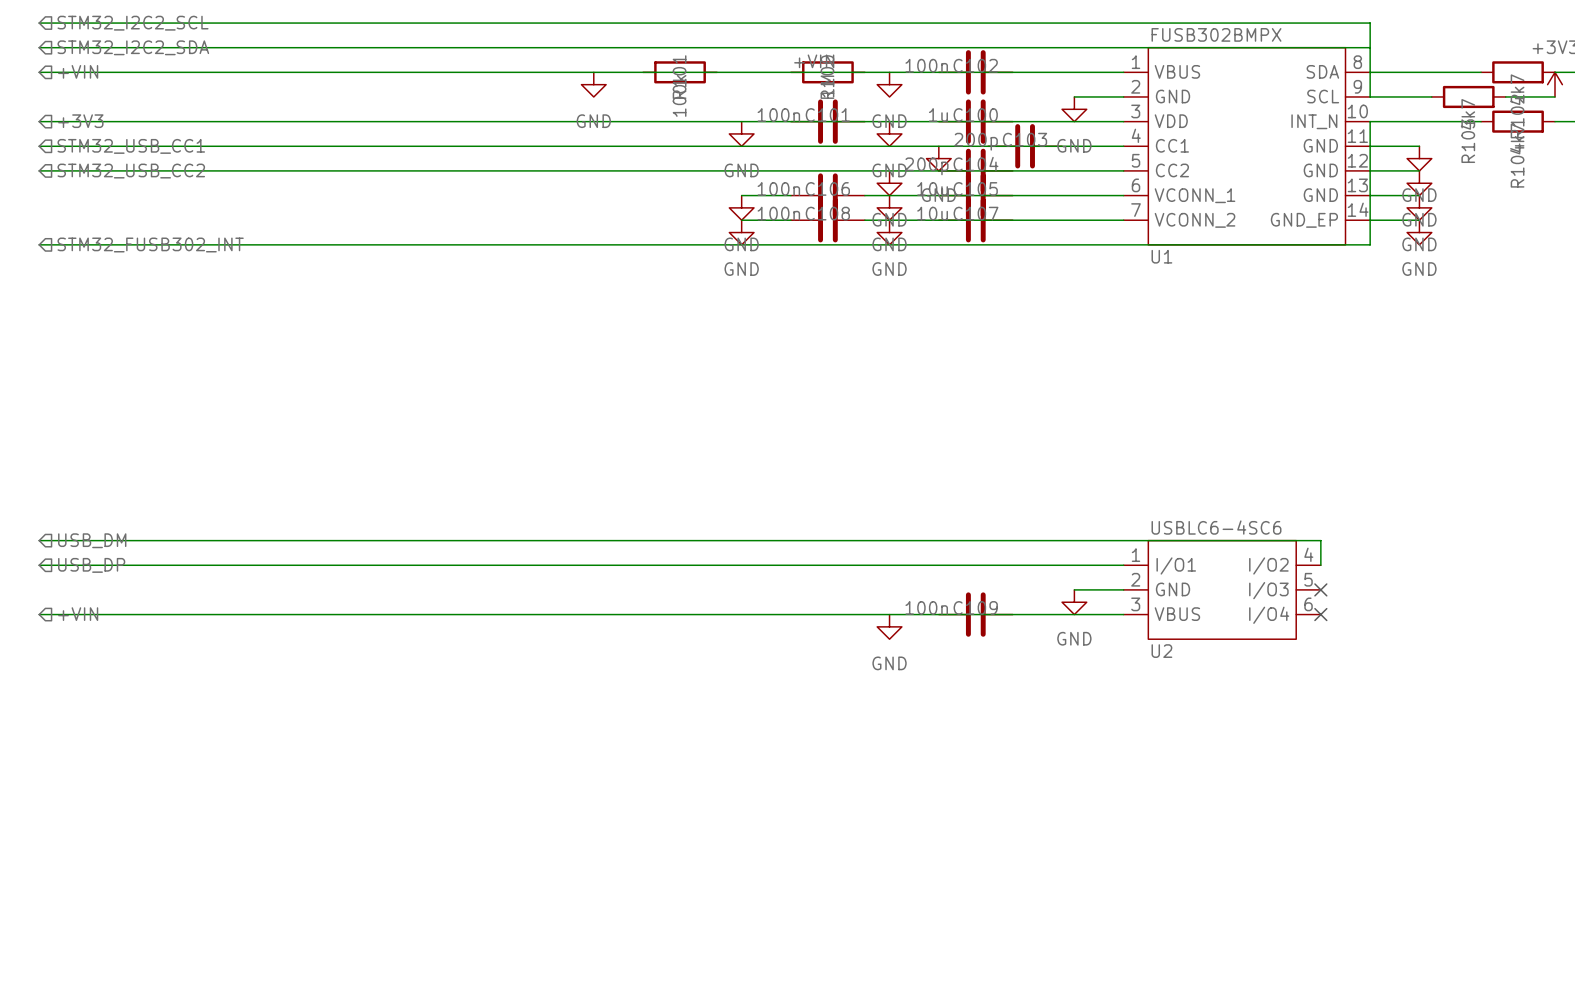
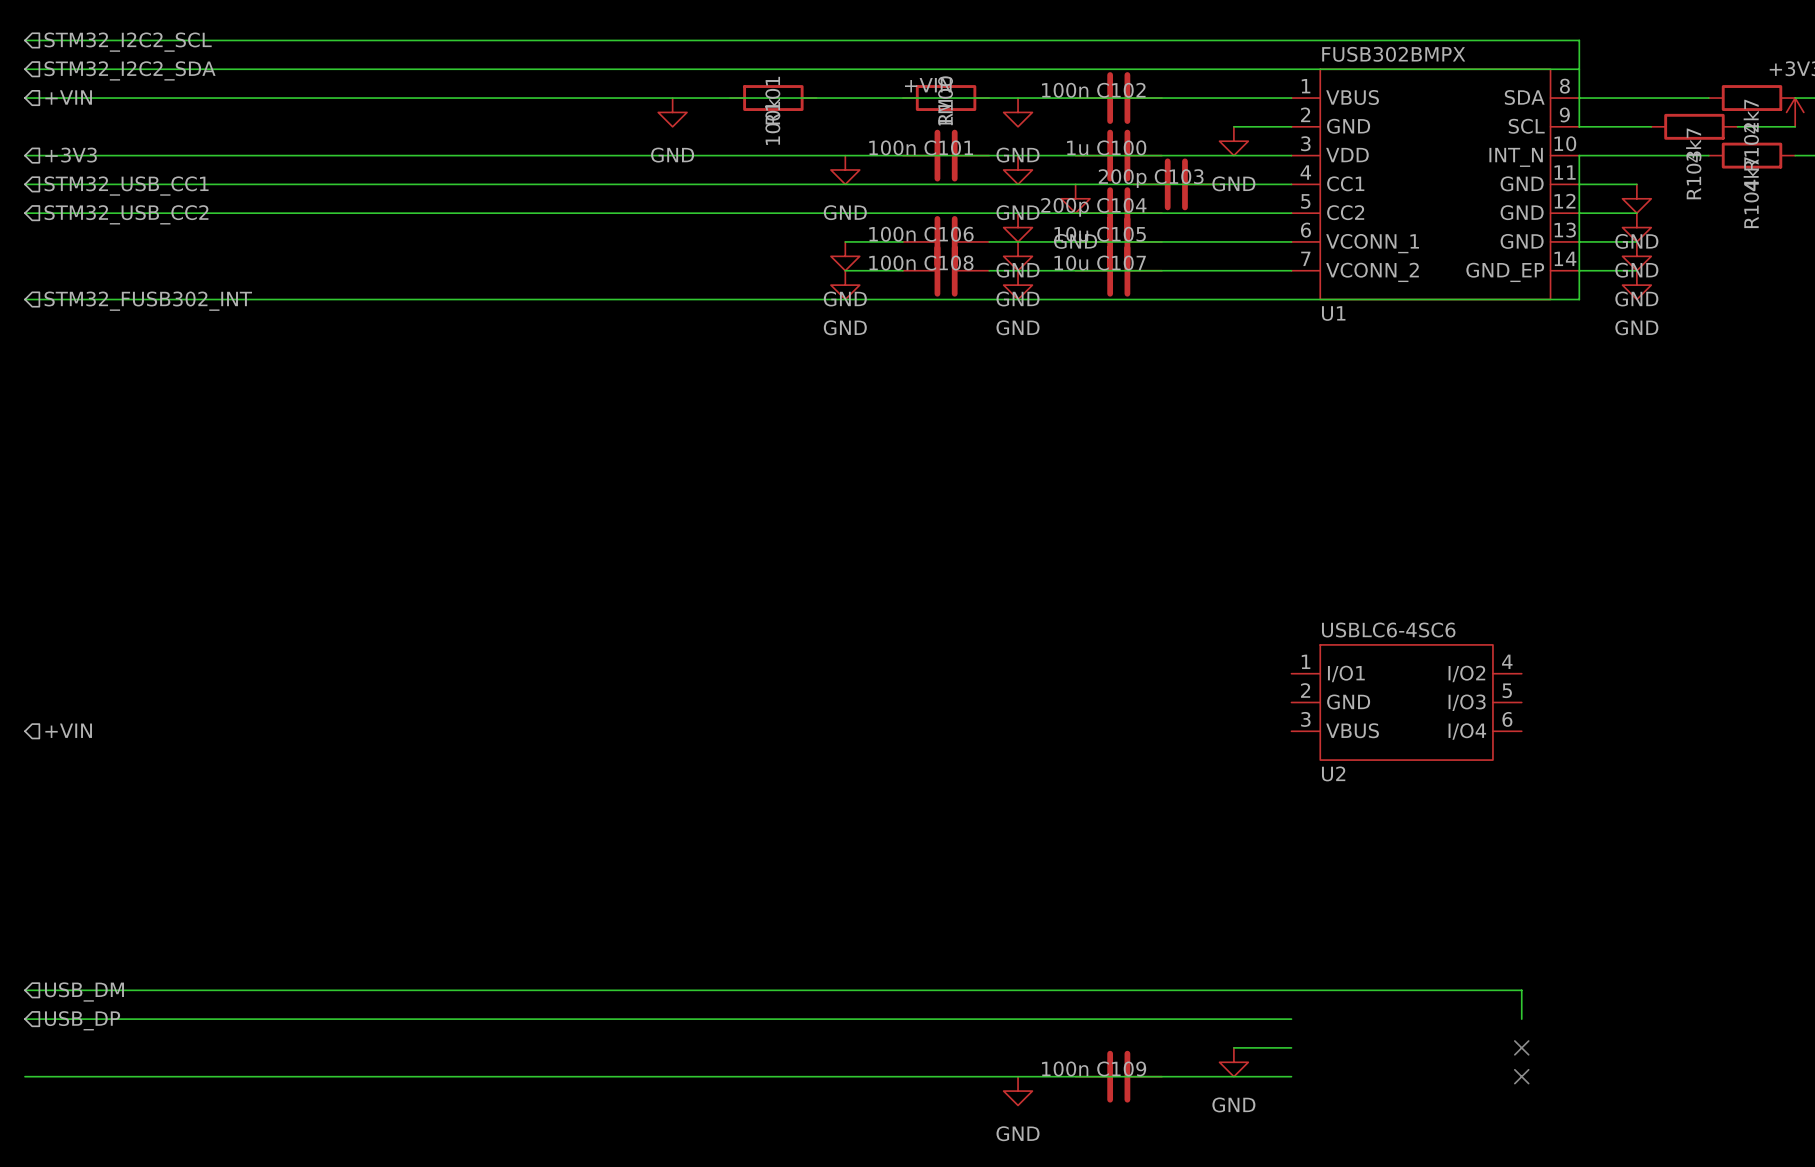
wire: (39, 540) (1320, 540) (1320, 565) -> none
hierarchical label: USB_DM (92, 540) -> none
wire: (39, 565) (1123, 565) -> none
hierarchical label: USB_DP (91, 565) -> none
wire: (1074, 589) (1123, 589) -> none
no-connect mark: (1320, 589) -> none
power symbol: GND (1074, 602) -> none
wire: (39, 614) (1123, 614) -> none
C109 position: (975, 614) -> (1118, 1076)
no-connect mark: (1320, 614) -> none
power symbol: GND (889, 626) -> none
wire: none -> (24, 990) (1521, 990) (1521, 1019)
hierarchical label: none -> USB_DM (84, 991)
wire: none -> (24, 1019) (1291, 1019)
hierarchical label: none -> USB_DP (82, 1020)
wire: none -> (1233, 1047) (1291, 1047)
no-connect mark: none -> (1521, 1047)
power symbol: none -> GND (1233, 1062)
wire: none -> (24, 1076) (1291, 1076)
no-connect mark: none -> (1521, 1076)
power symbol: none -> GND (1018, 1091)

